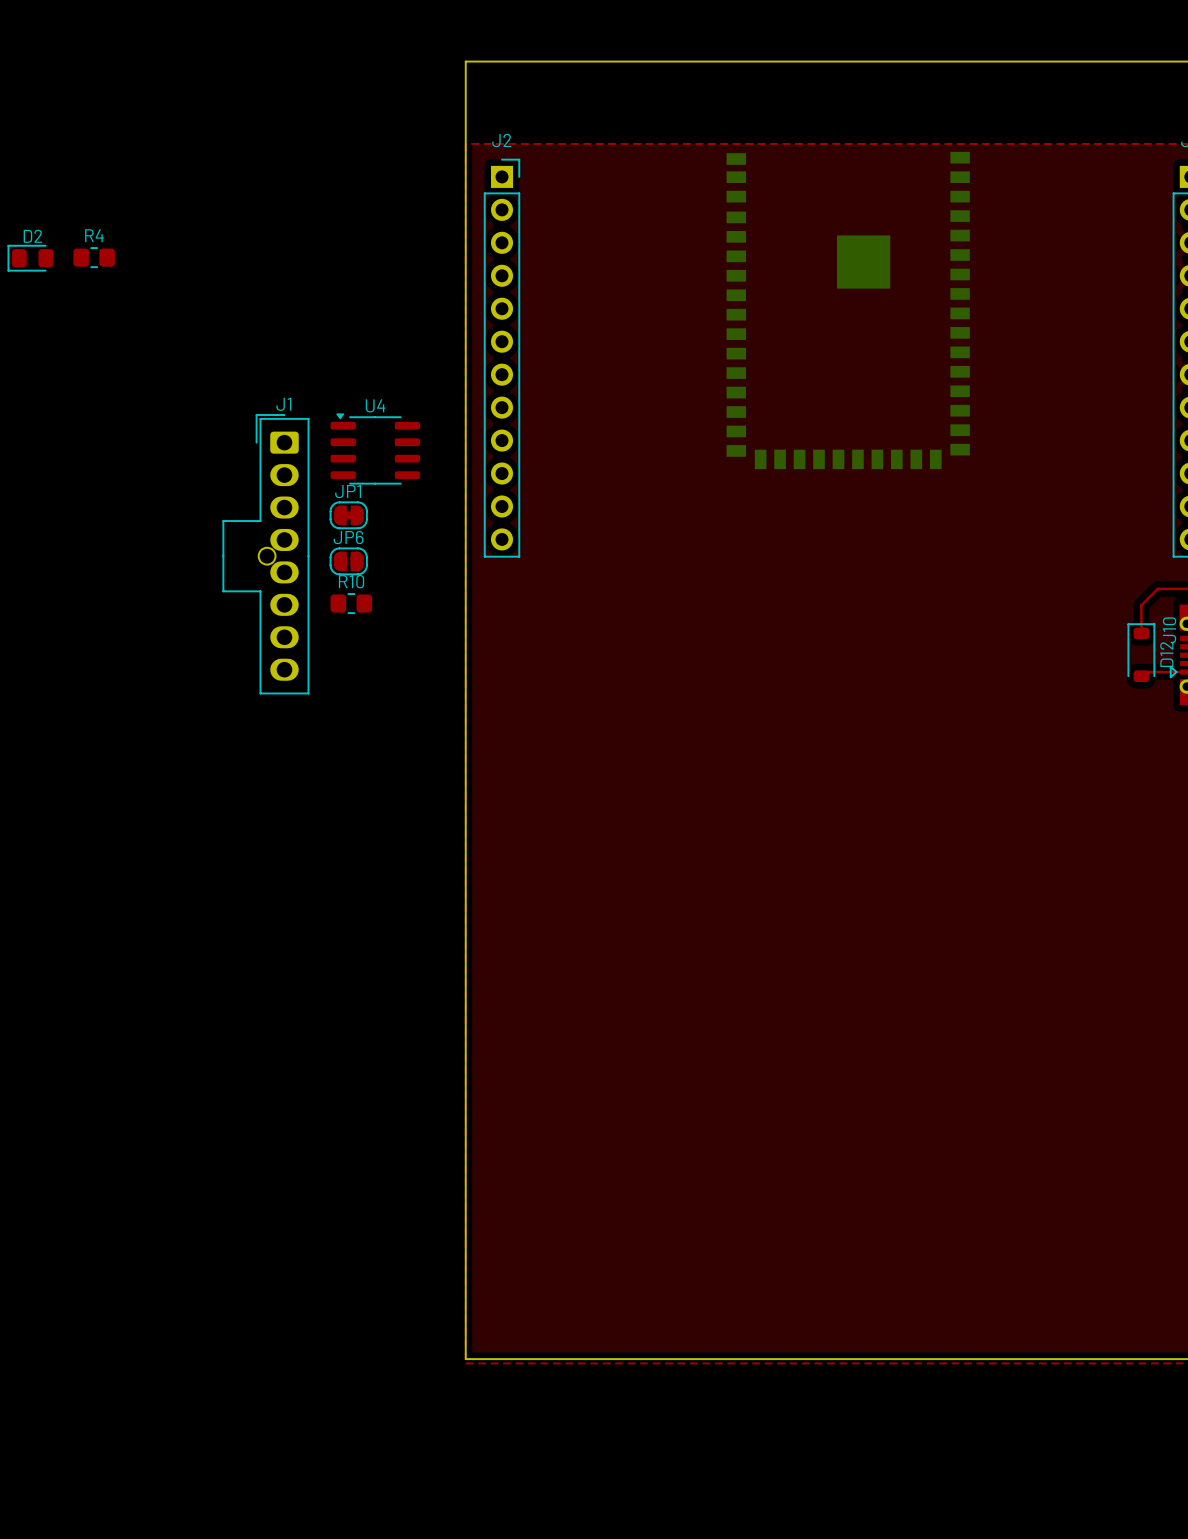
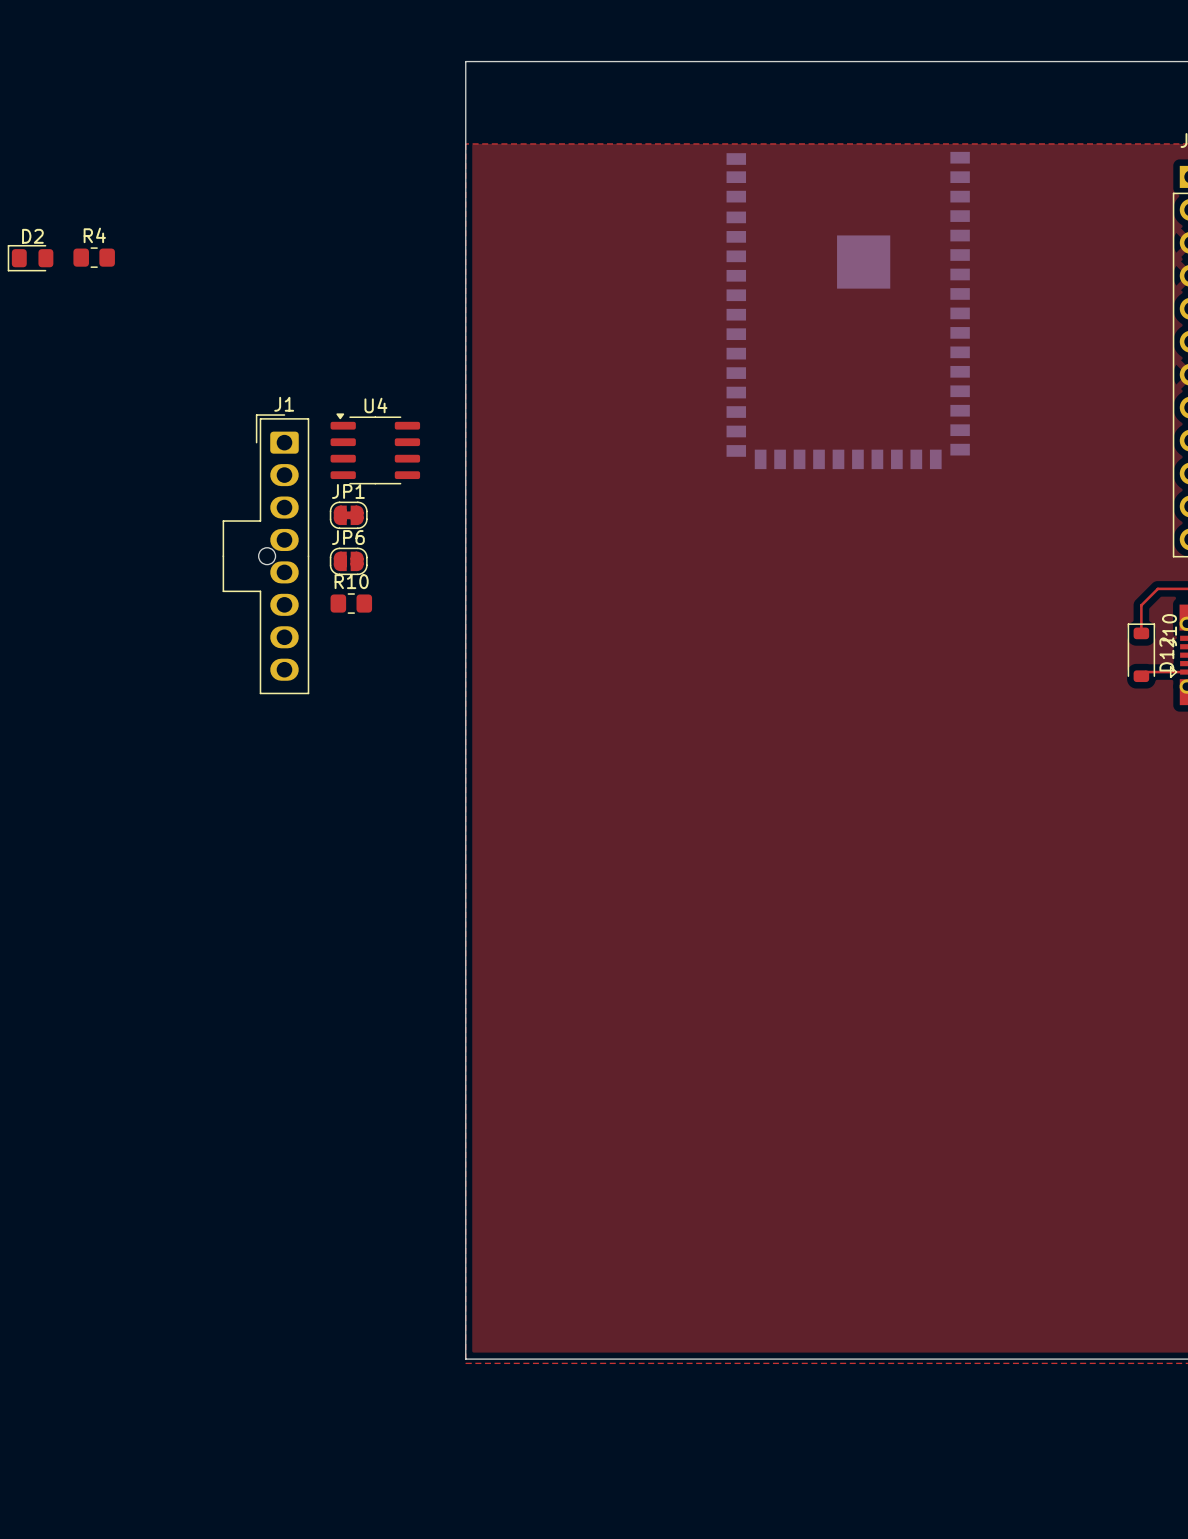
J2: (502, 358) -> none

